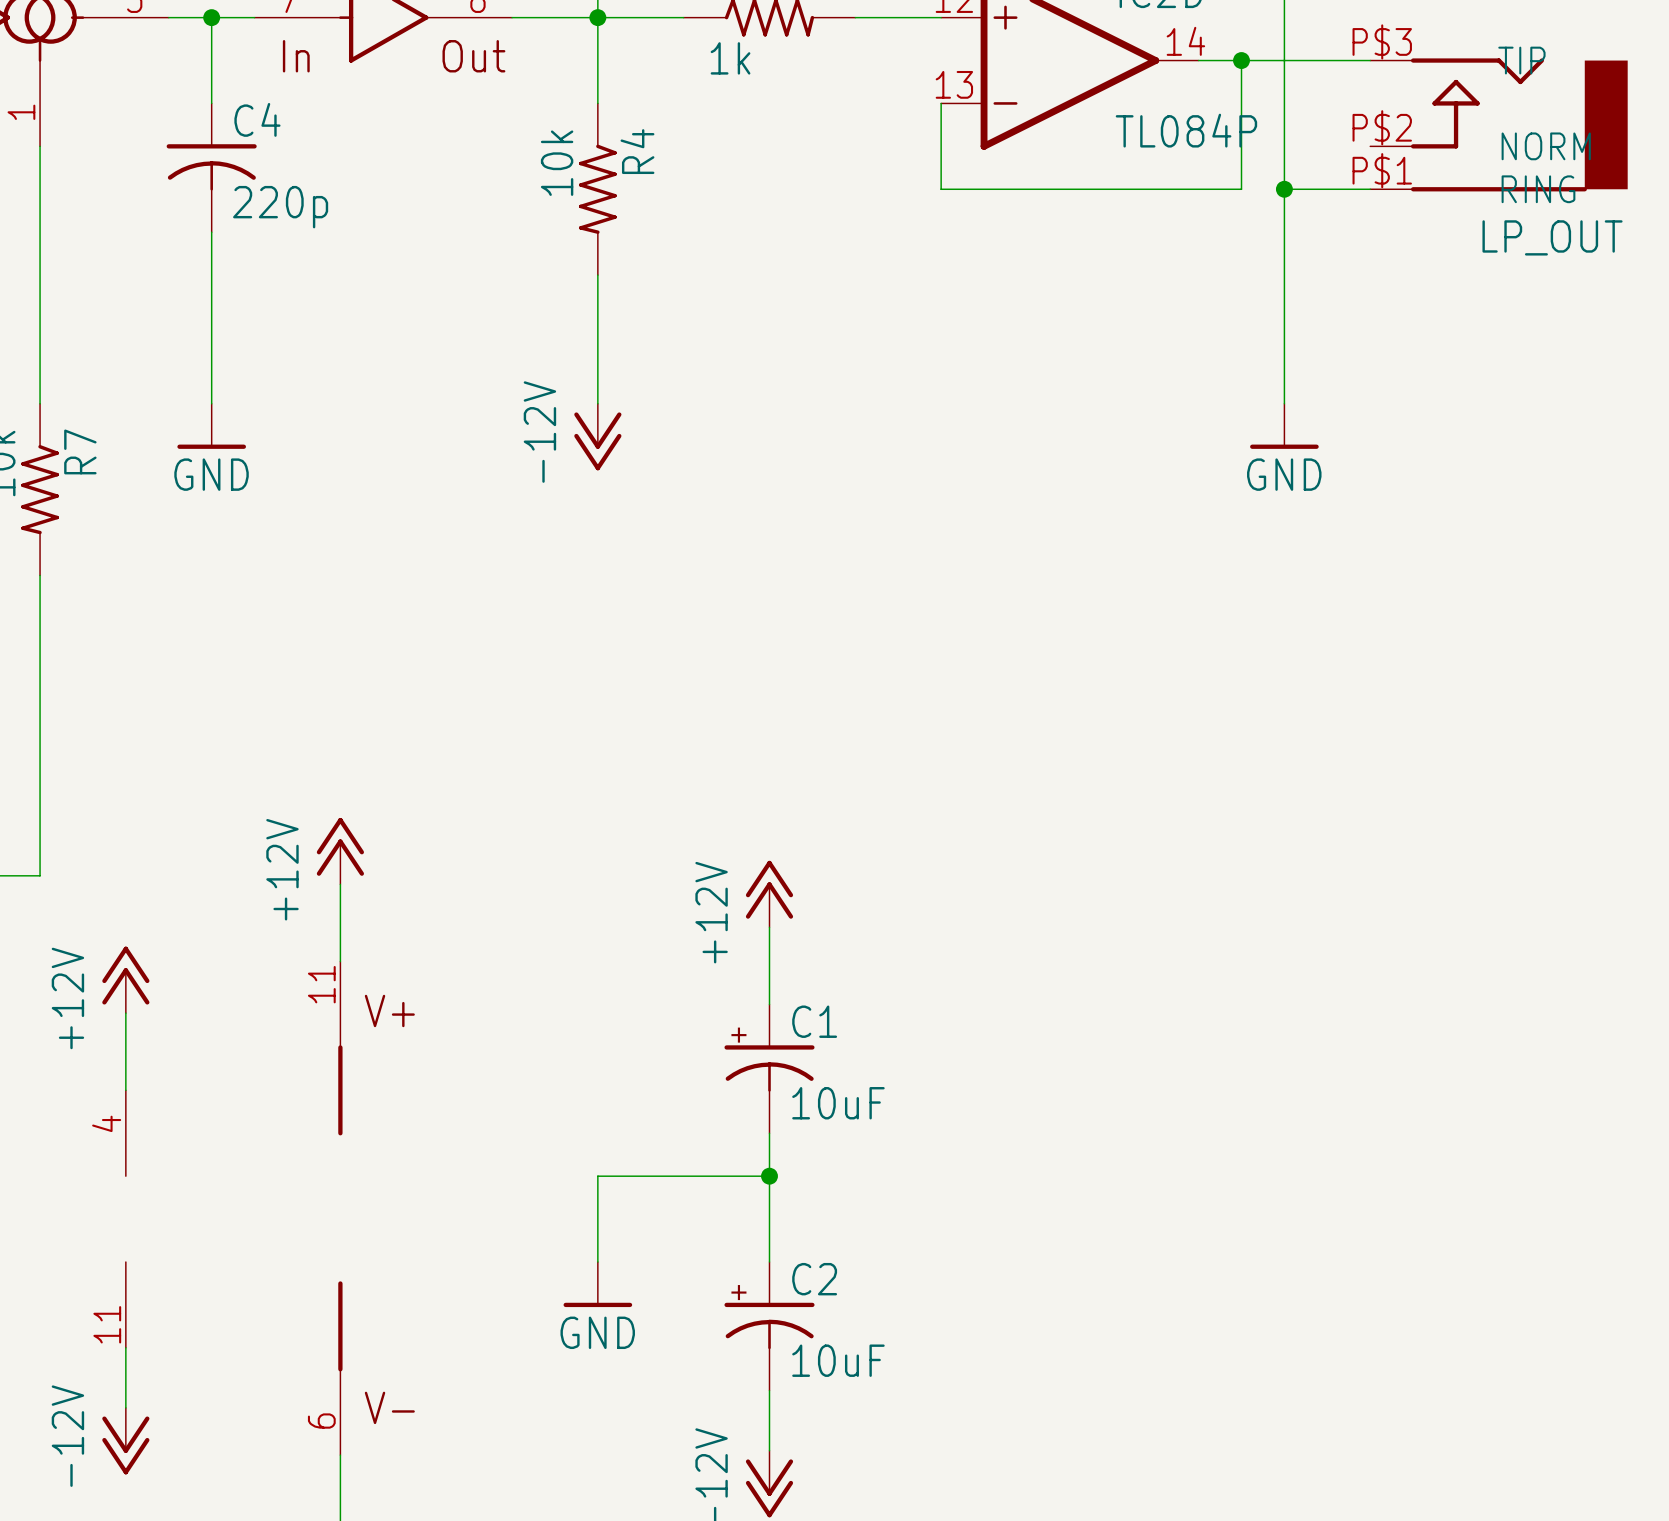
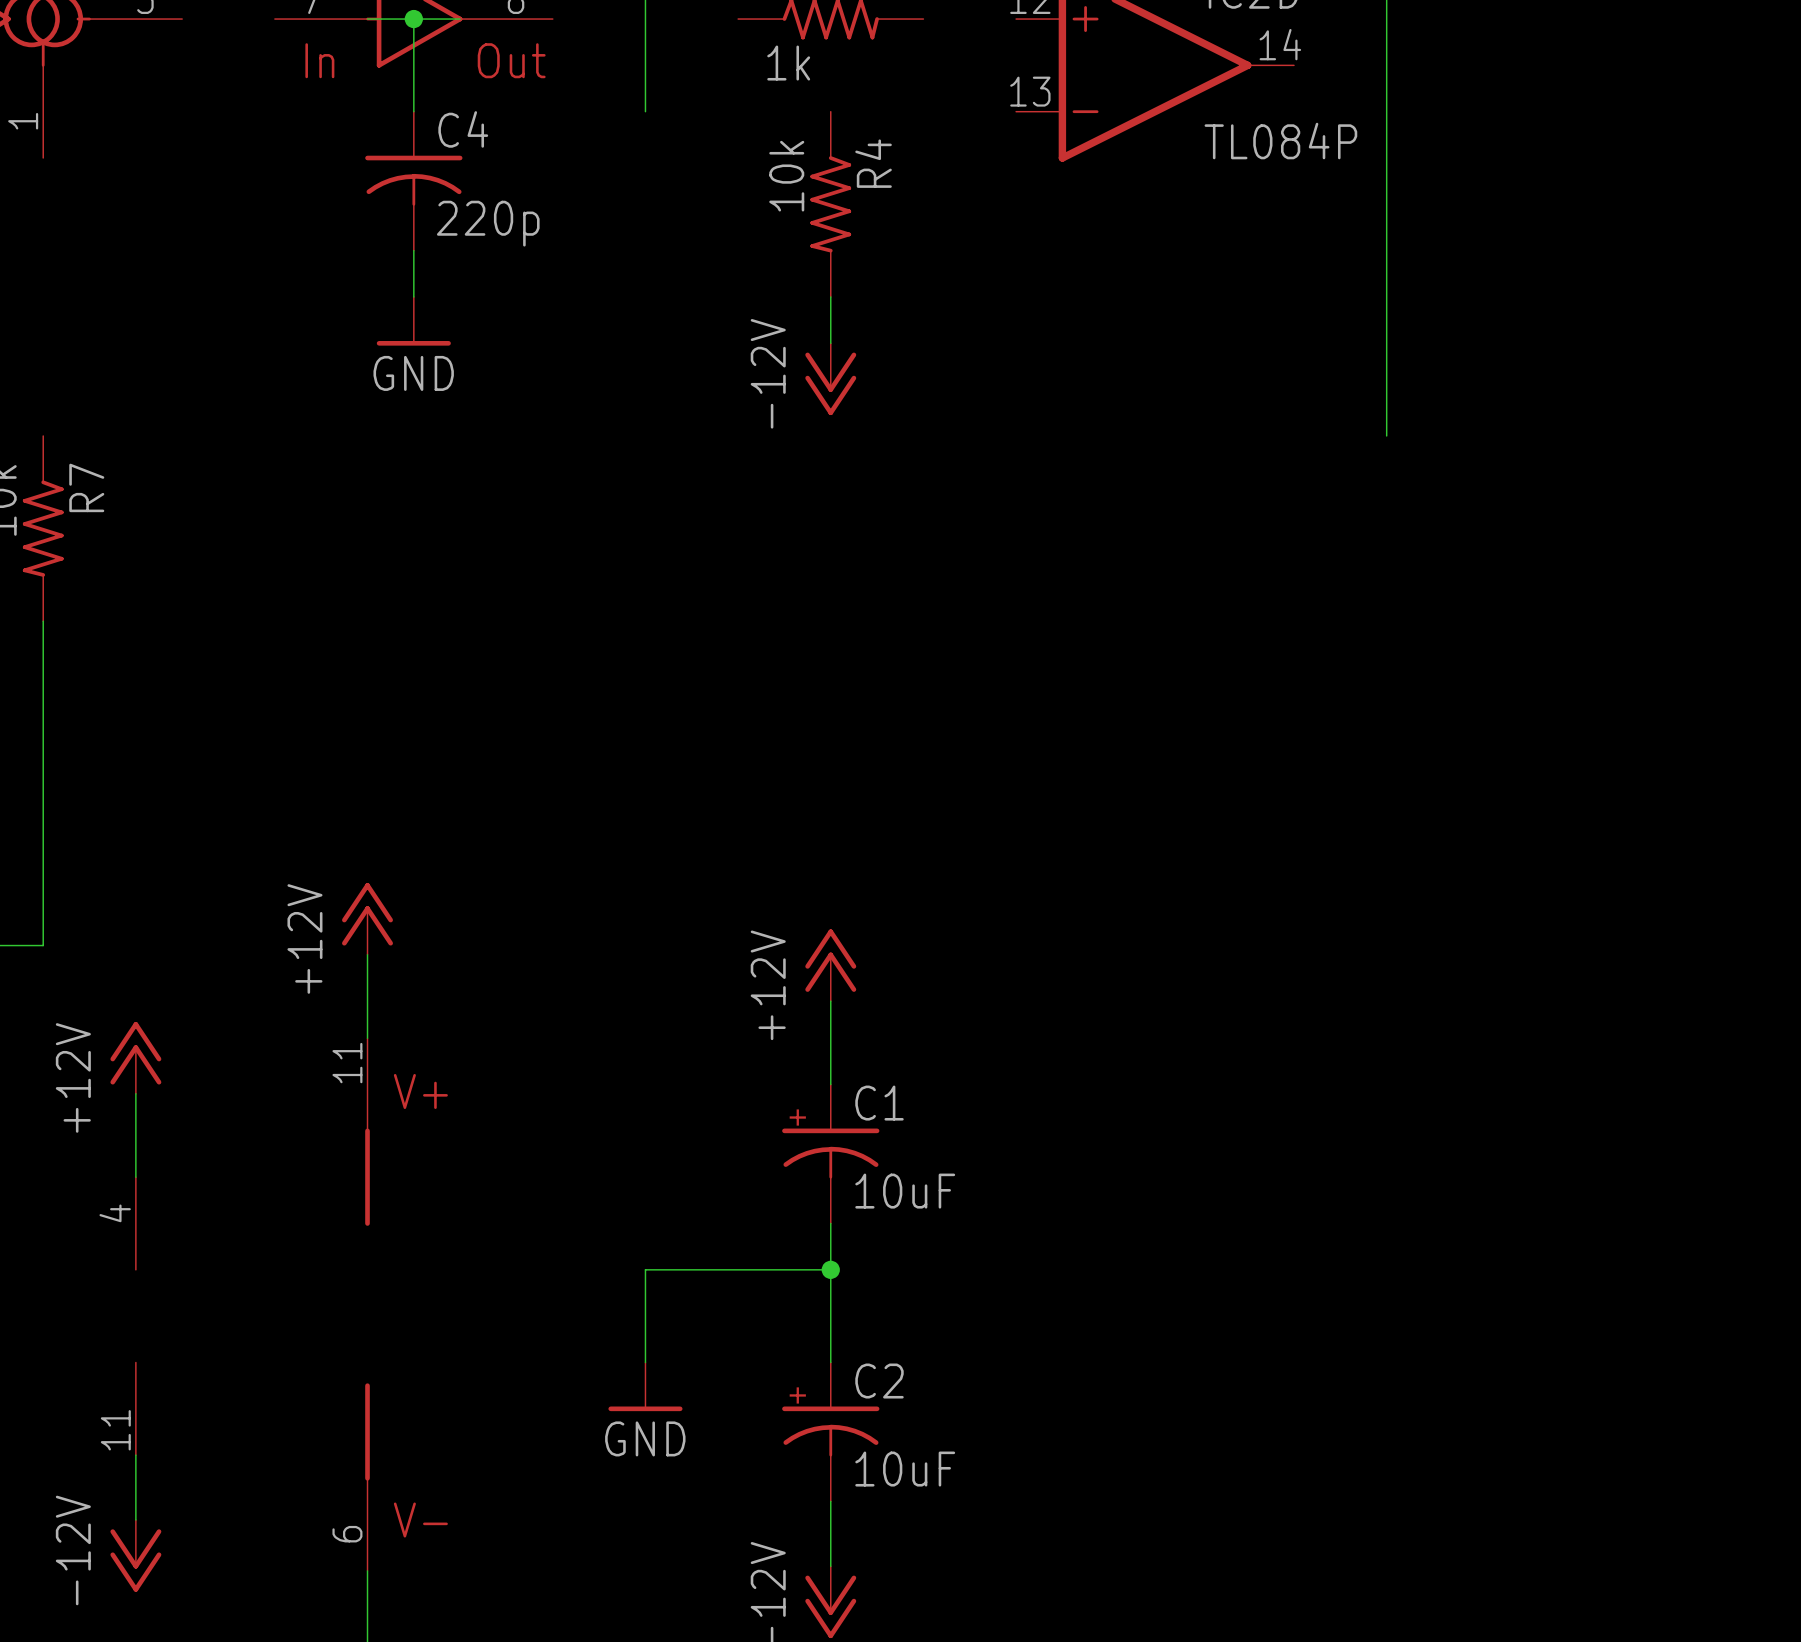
wire: (168, 17) (254, 17) -> (367, 19) (460, 19)
wire: (211, 17) (211, 103) -> (413, 19) (413, 111)
junction: (211, 17) -> none
junction: none -> (413, 19)
wire: (512, 17) (683, 17) -> none
junction: (597, 17) -> none
wire: (855, 17) (941, 17) -> none
wire: (1198, 60) (1370, 60) -> none
wire: (1241, 60) (1241, 189) (941, 189) (941, 103) -> none
junction: (1241, 60) -> none
LP_OUT: (1498, 124) -> none
wire: (40, 146) (40, 403) -> none
C4 position: (211, 167) -> (413, 181)
R4 position: (597, 189) -> (830, 204)
wire: (1284, 189) (1370, 189) -> none
junction: (1284, 189) -> none
wire: (211, 232) (211, 403) -> none
wire: none -> (413, 250) (413, 296)
wire: (597, 275) (597, 403) -> none
wire: none -> (830, 296) (830, 343)
power symbol position: GND (211, 426) -> GND (413, 321)
power symbol: GND (1284, 426) -> none
power symbol position: -12V (597, 437) -> -12V (830, 379)

